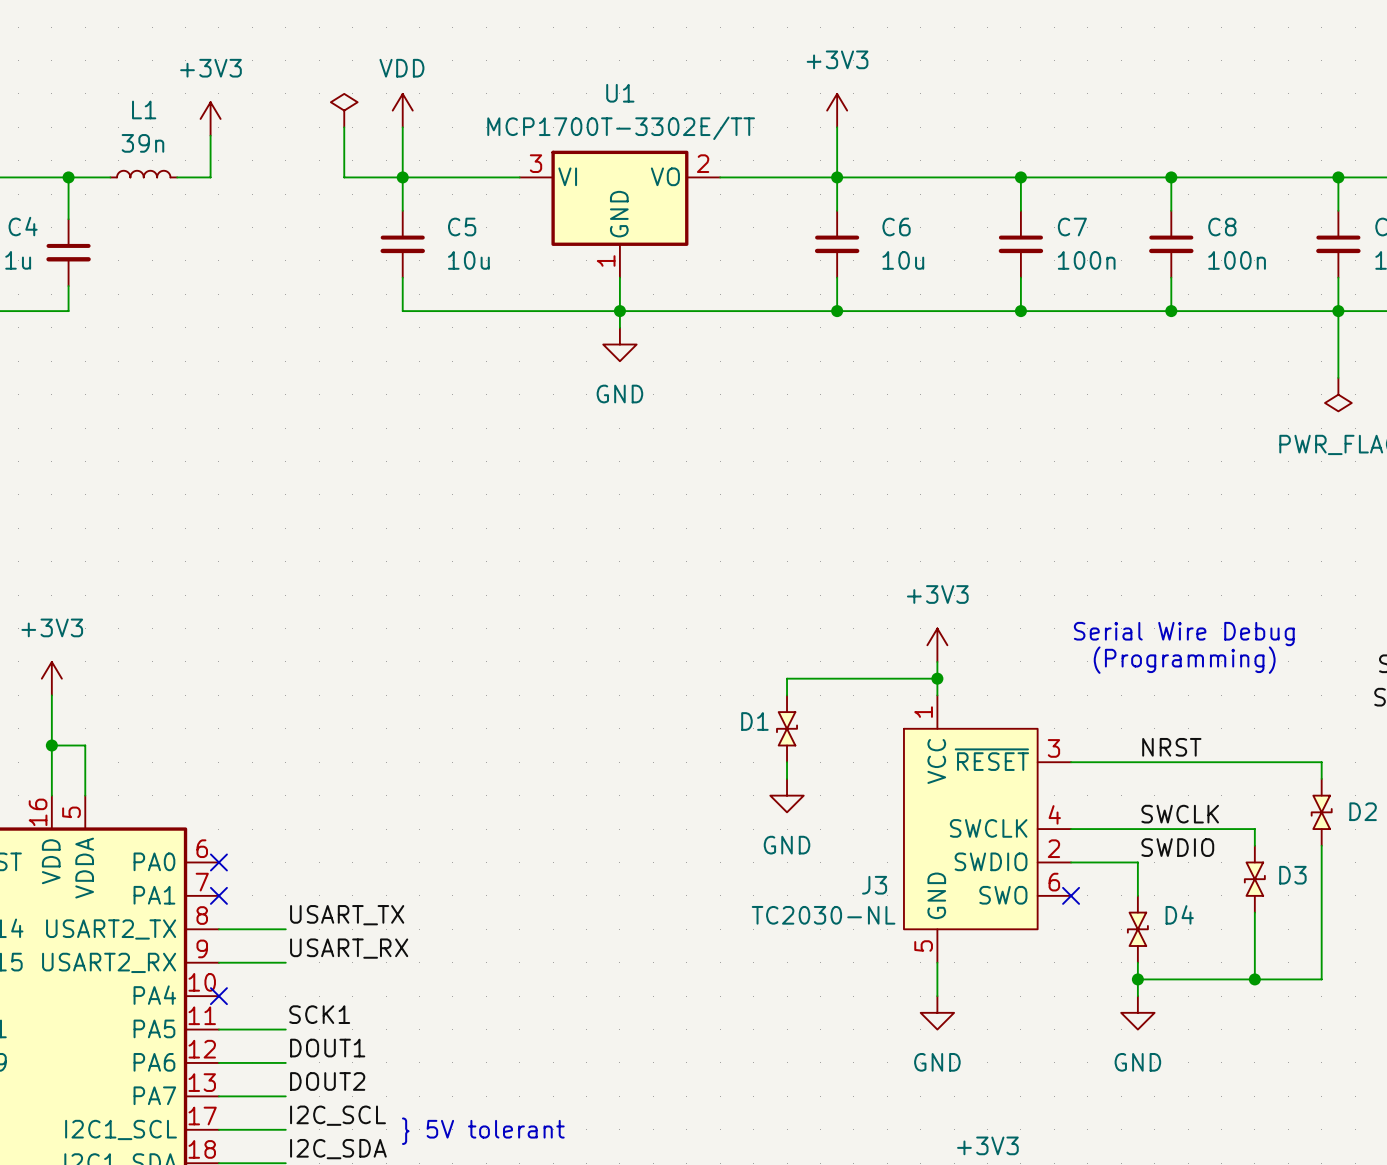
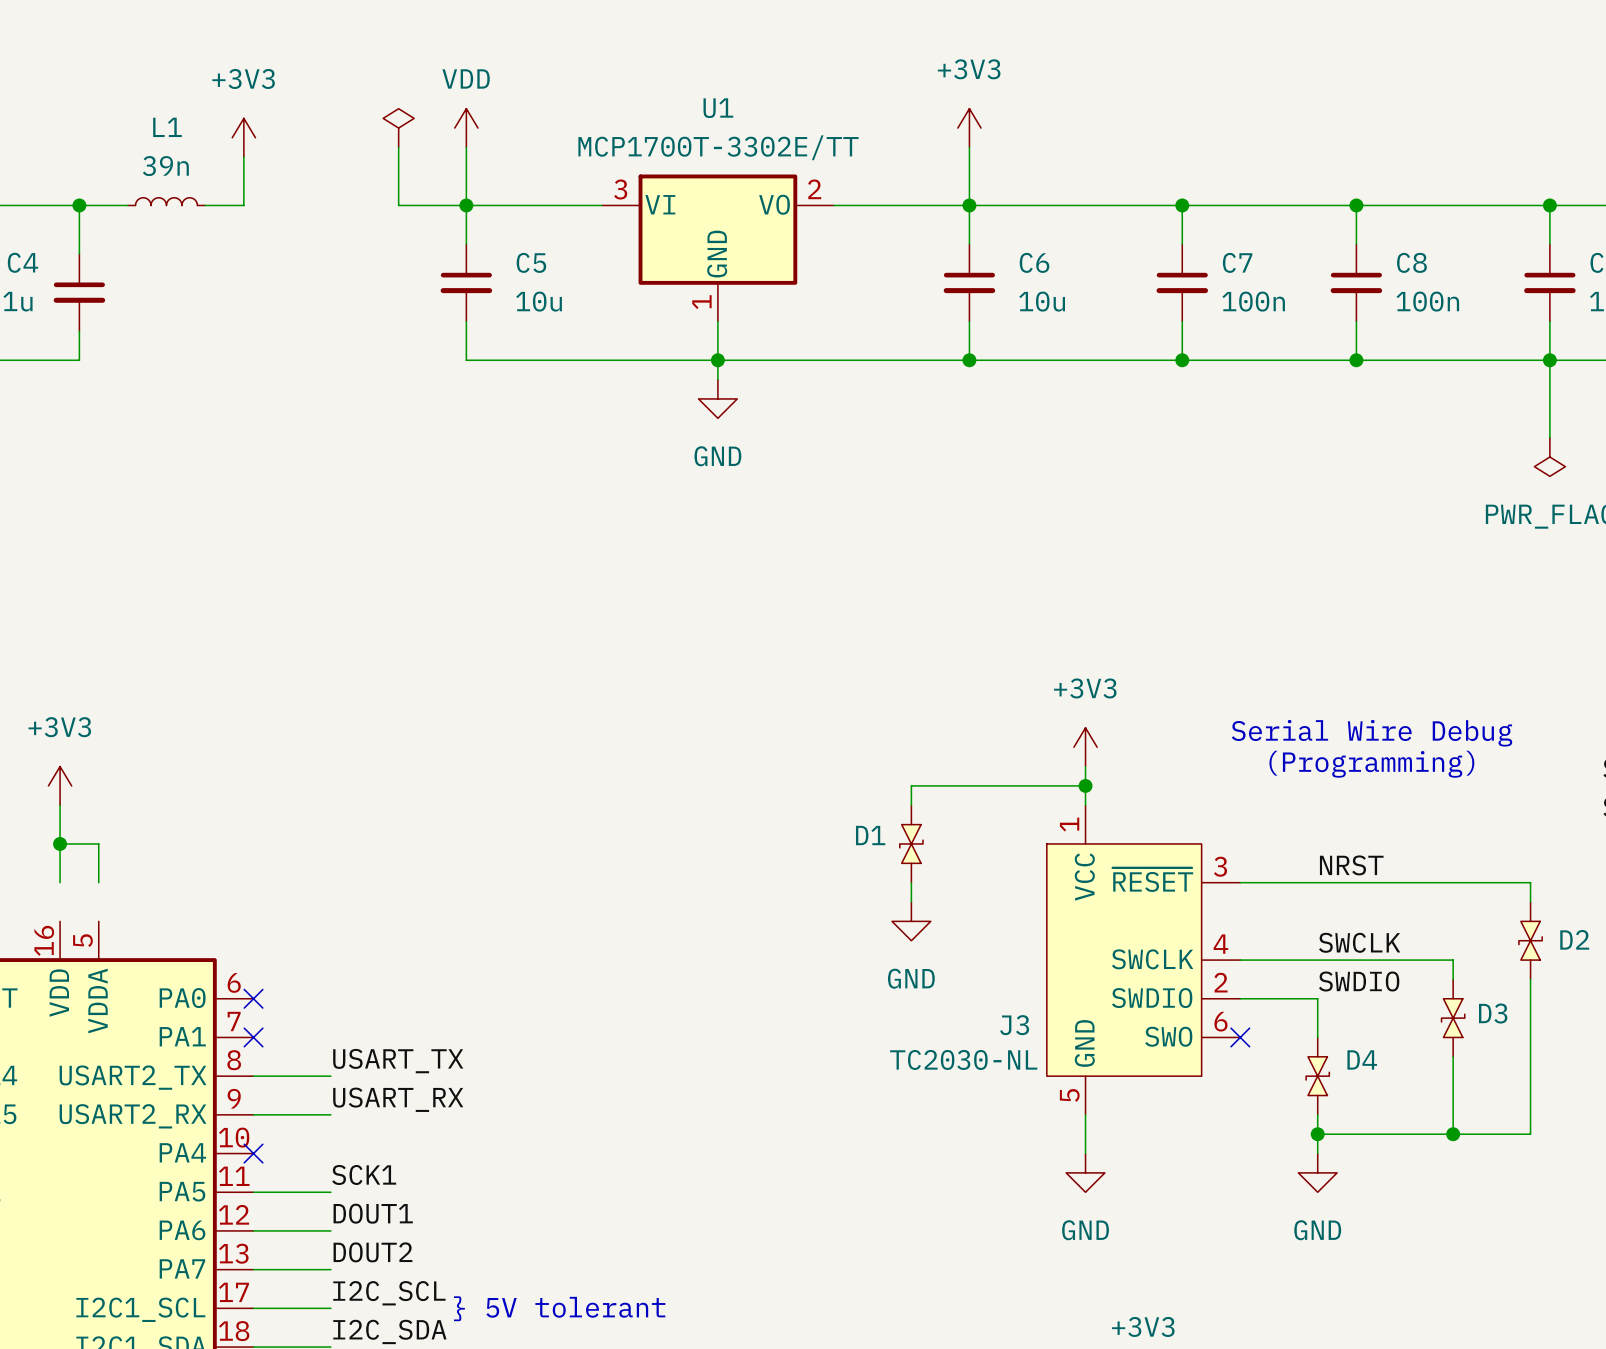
wire: (51, 745) (85, 745) -> (60, 843) (98, 843) (98, 863)
junction position: (51, 745) -> (60, 843)
wire: (51, 762) (51, 795) -> none
wire: (85, 762) (85, 795) -> none

